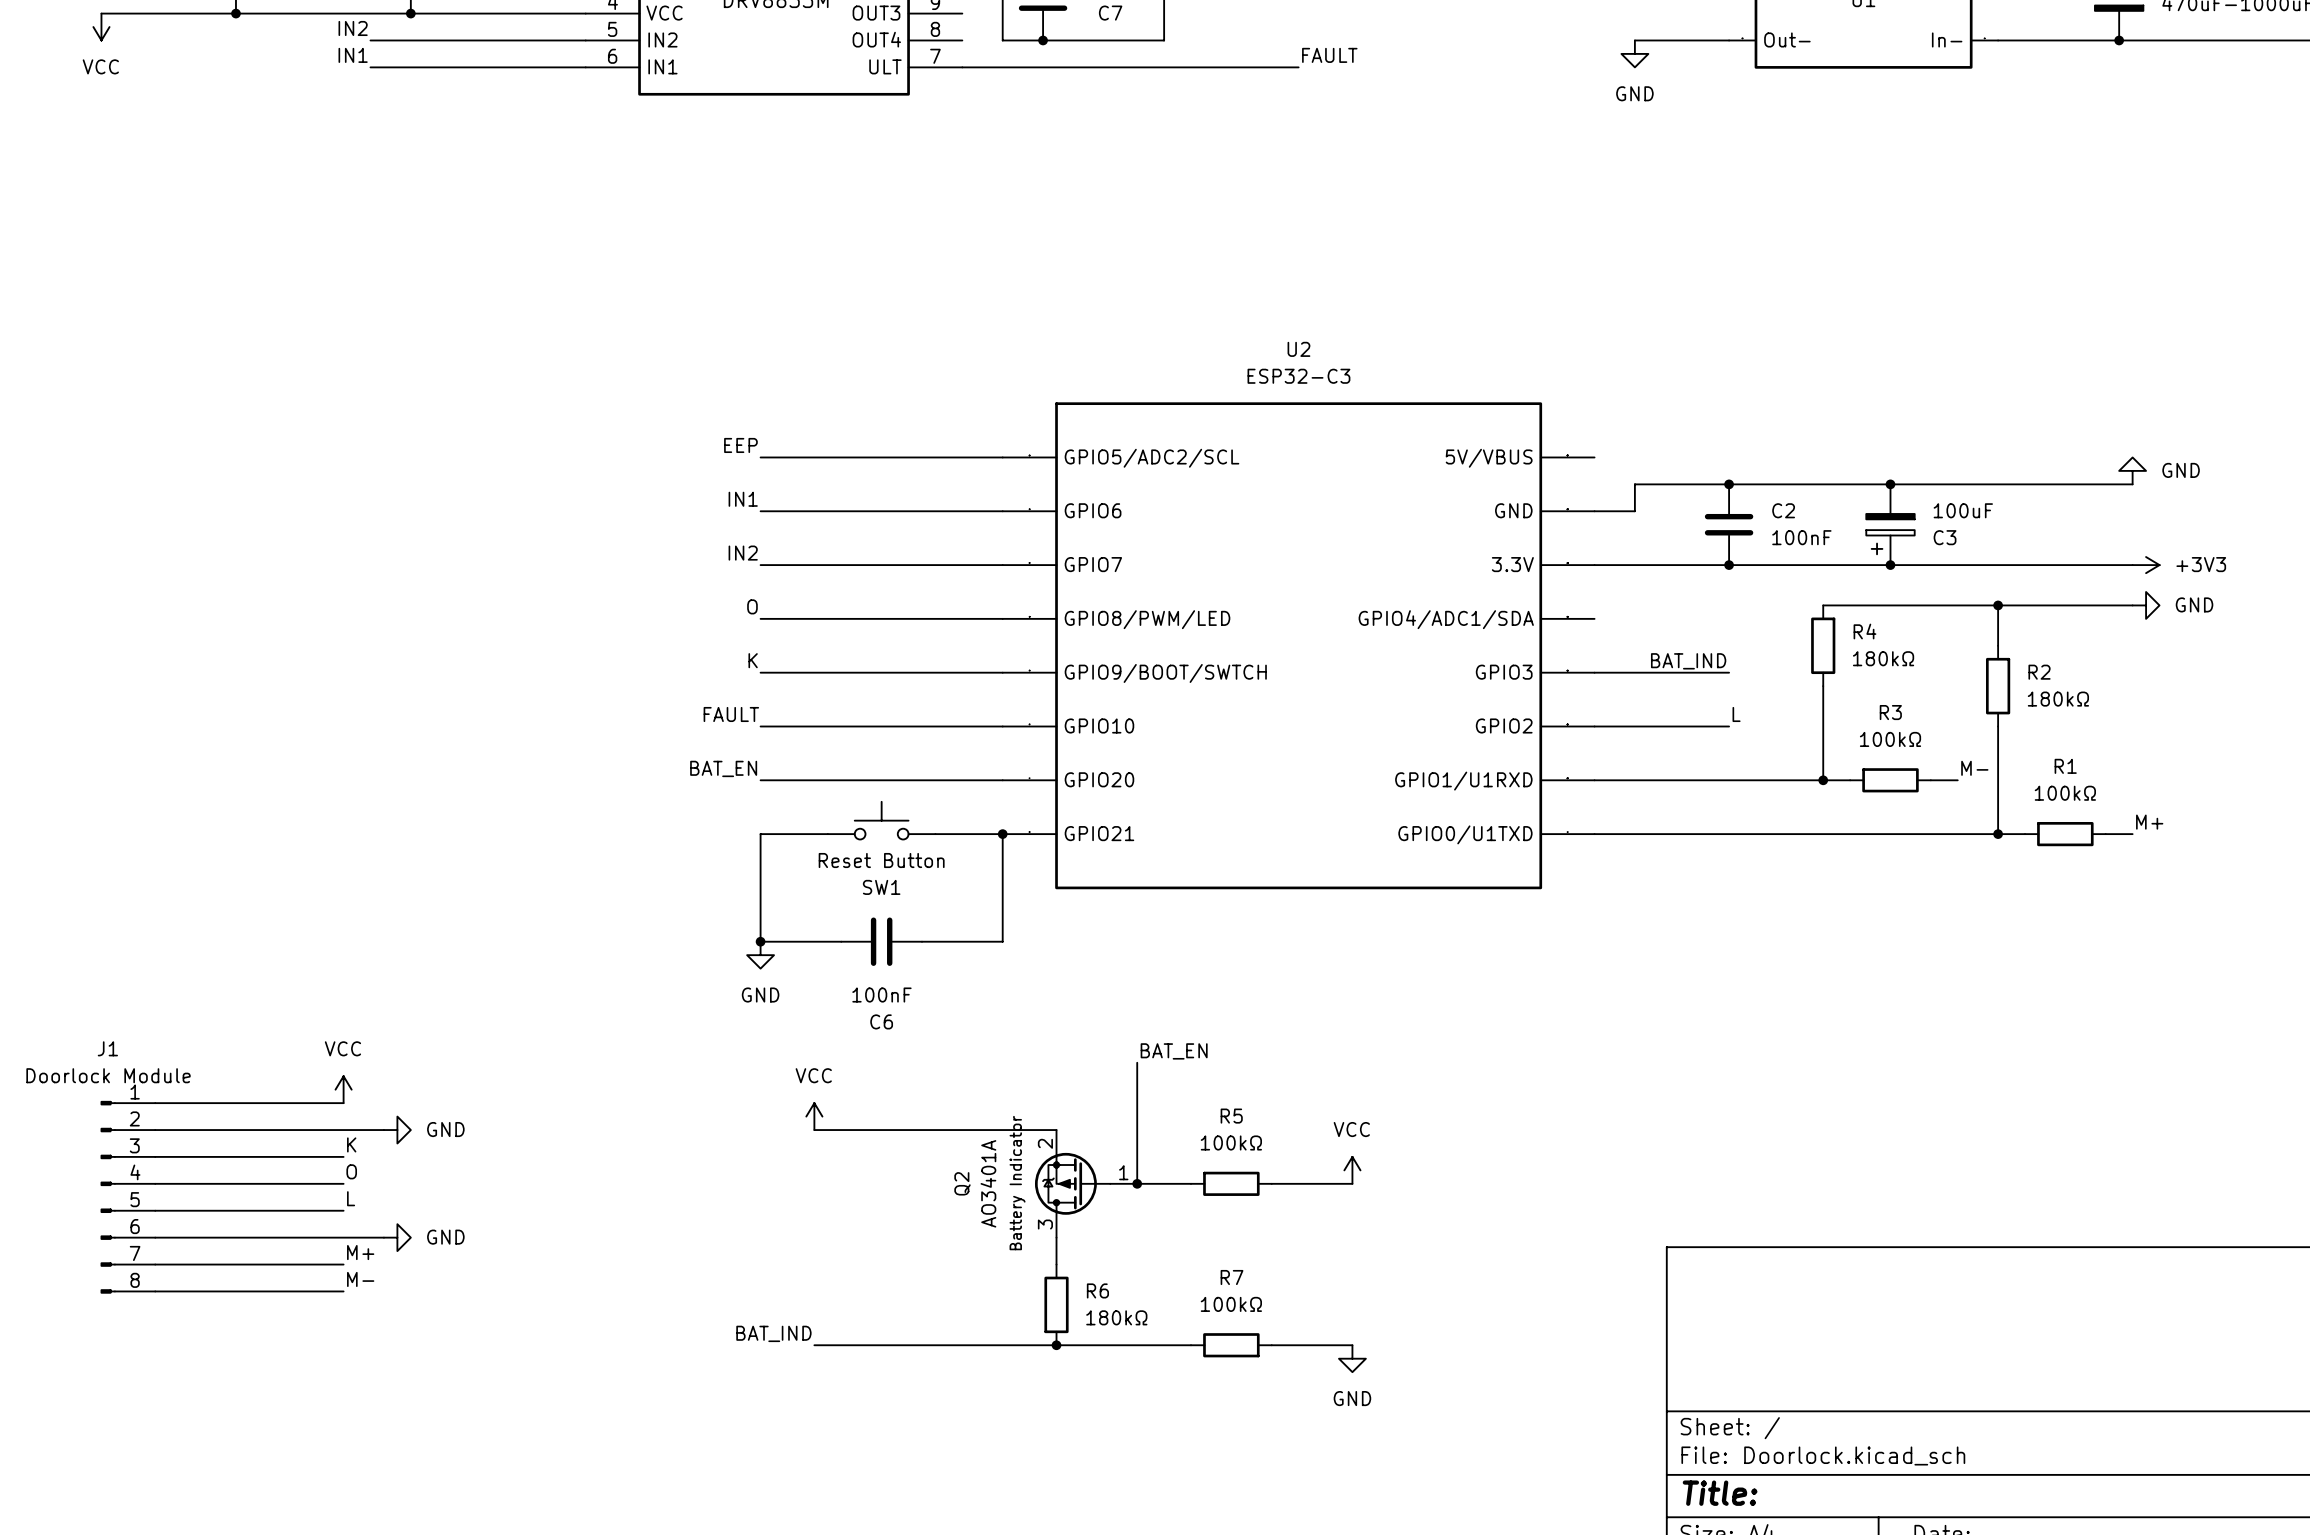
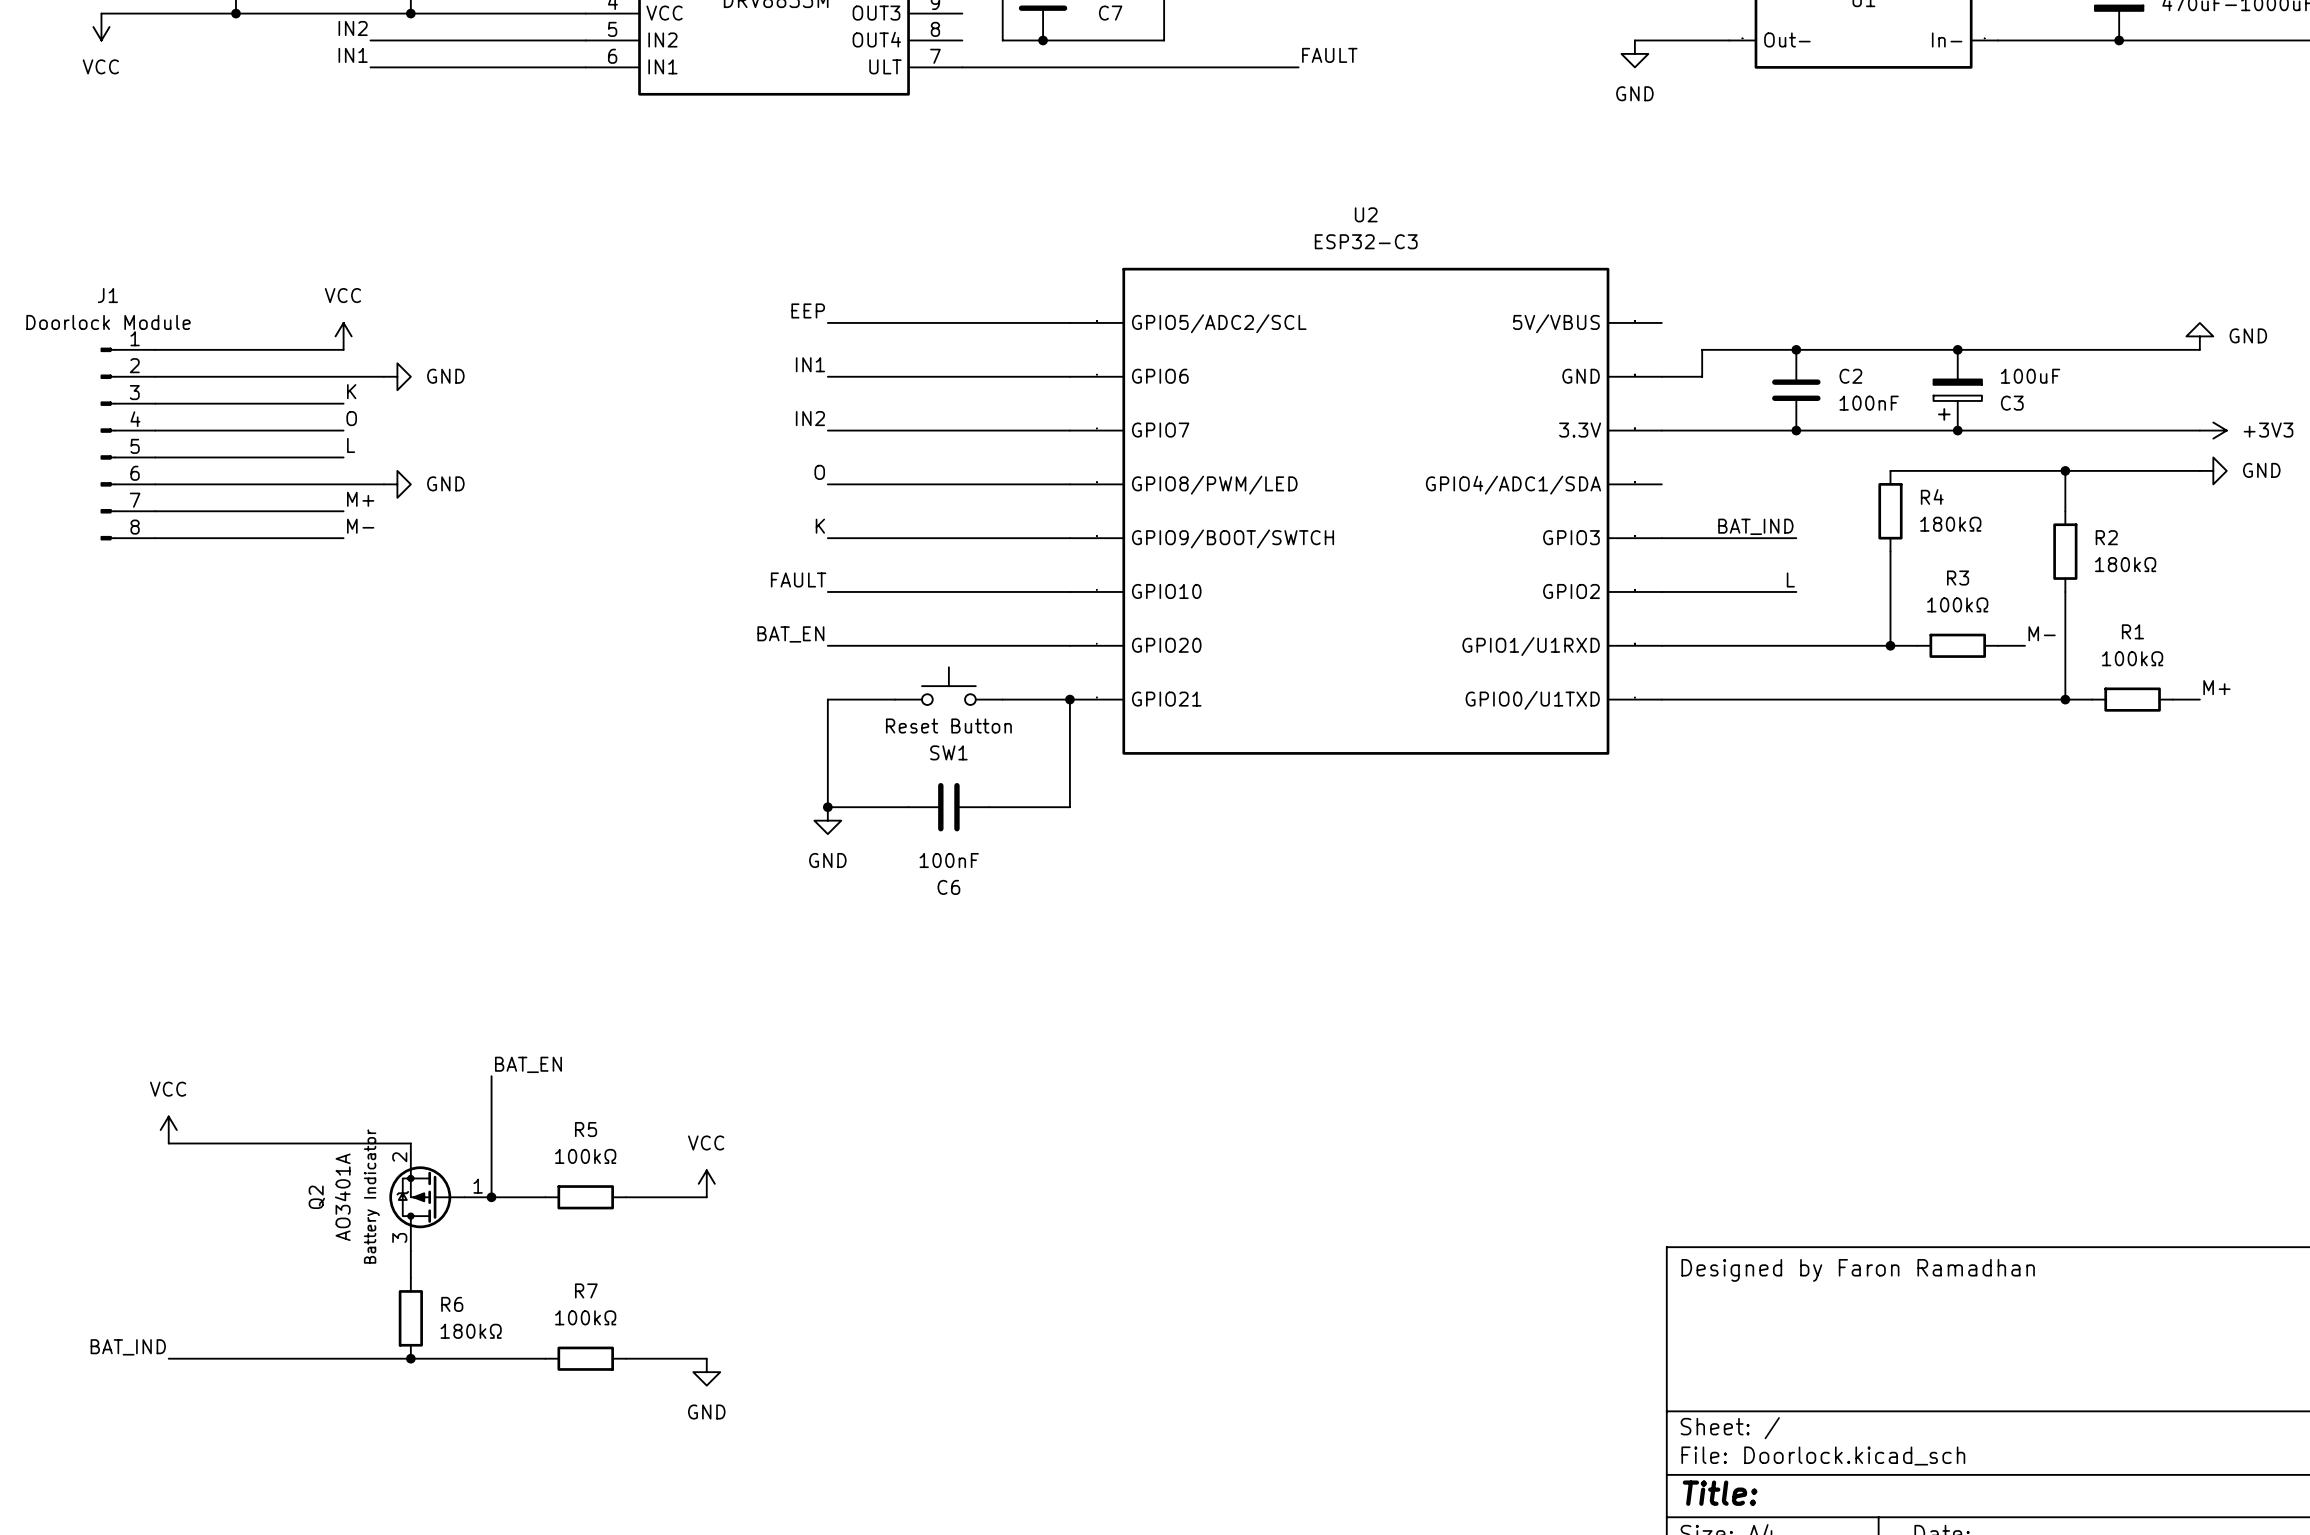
power symbol: none -> VCC (343, 336)
power symbol: none -> GND (2199, 336)
wire: none -> (155, 349) (343, 349)
junction: none -> (1796, 349)
junction: none -> (1957, 349)
wire: none -> (155, 376) (383, 376)
power symbol: none -> GND (397, 376)
label: none -> K (351, 391)
wire: none -> (155, 403) (343, 403)
label: none -> O (351, 418)
wire: none -> (155, 430) (343, 430)
junction: none -> (1796, 430)
junction: none -> (1957, 430)
label: none -> L (351, 445)
label position: EEP (740, 445) -> EEP (808, 310)
wire: none -> (155, 457) (343, 457)
wire: (760, 457) (1002, 457) -> (827, 322) (1069, 322)
wire: none -> (2065, 470) (2065, 511)
junction: none -> (2065, 470)
power symbol: GND (2132, 470) -> none
power symbol: none -> GND (2213, 470)
wire: none -> (155, 484) (383, 484)
power symbol: none -> GND (397, 484)
junction: (1729, 484) -> none
junction: (1890, 484) -> none
wire: (2132, 484) (1634, 484) (1634, 511) (1594, 511) -> (2199, 349) (1702, 349) (1702, 376) (1661, 376)
label: none -> M+ (360, 499)
label position: IN1 (743, 499) -> IN1 (810, 364)
wire: none -> (155, 511) (343, 511)
wire: (760, 511) (1002, 511) -> (827, 376) (1069, 376)
C2 position: (1729, 524) -> (1796, 390)
C3 position: (1890, 524) -> (1957, 390)
label: none -> M- (360, 526)
wire: none -> (155, 538) (343, 538)
label position: IN2 (743, 553) -> IN2 (810, 418)
wire: (760, 565) (1002, 565) -> (827, 430) (1069, 430)
wire: (1594, 565) (2132, 565) -> (1661, 430) (2199, 430)
junction: (1729, 565) -> none
junction: (1890, 565) -> none
power symbol position: +3V3 (2146, 565) -> +3V3 (2213, 430)
wire: (1823, 605) (2132, 605) -> (1890, 470) (2199, 470)
wire: (1998, 605) (1998, 645) -> (2025, 645) (1998, 645)
junction: (1998, 605) -> none
power symbol: GND (2146, 605) -> none
label position: O (752, 606) -> O (819, 472)
wire: (760, 618) (1002, 618) -> (827, 484) (1069, 484)
U2 position: (1298, 645) -> (1365, 511)
R4 position: (1823, 645) -> (1890, 511)
junction: none -> (1890, 645)
label position: K (753, 660) -> K (820, 526)
label position: BAT_IND (1688, 661) -> BAT_IND (1755, 526)
wire: (760, 672) (1002, 672) -> (827, 538) (1069, 538)
wire: (1594, 672) (1729, 672) -> (1661, 538) (1796, 538)
wire: (1823, 686) (1823, 780) -> (1890, 551) (1890, 645)
R2 position: (1998, 686) -> (2065, 551)
junction: none -> (1069, 699)
junction: none -> (2065, 699)
label position: FAULT (731, 714) -> FAULT (798, 579)
label position: L (1736, 714) -> L (1790, 579)
wire: (760, 726) (1002, 726) -> (827, 591) (1069, 591)
wire: (1594, 726) (1729, 726) -> (1661, 591) (1796, 591)
wire: (1998, 726) (1998, 834) -> (2065, 591) (2065, 699)
label position: BAT_EN (723, 768) -> BAT_EN (790, 634)
label position: M- (1974, 768) -> M- (2042, 633)
wire: (760, 780) (1002, 780) -> (827, 645) (1069, 645)
wire: (1594, 780) (1850, 780) -> (1661, 645) (1917, 645)
junction: (1823, 780) -> none
R3 position: (1890, 780) -> (1957, 645)
wire: (1930, 780) (1957, 780) -> none
junction: none -> (827, 807)
SW1 position: (881, 820) -> (948, 686)
label position: M+ (2149, 822) -> M+ (2216, 687)
wire: (827, 834) (760, 834) (760, 941) (841, 941) -> (895, 699) (827, 699) (827, 807) (908, 807)
wire: (935, 834) (1002, 834) (1002, 941) (922, 941) -> (1002, 699) (1069, 699) (1069, 807) (989, 807)
junction: (1002, 834) -> none
wire: (1594, 834) (2025, 834) -> (1661, 699) (2092, 699)
junction: (1998, 834) -> none
R1 position: (2065, 834) -> (2132, 699)
wire: (2105, 834) (2132, 834) -> (2172, 699) (2199, 699)
junction: (760, 941) -> none
C6 position: (881, 941) -> (948, 807)
power symbol position: GND (760, 955) -> GND (827, 820)
label: BAT_EN (1174, 1051) -> none
wire: (1137, 1062) (1137, 1183) (1191, 1183) -> none
label: none -> BAT_EN (528, 1064)
wire: none -> (491, 1076) (491, 1197) (545, 1197)
power symbol position: VCC (343, 1089) -> VCC (168, 1130)
wire: (155, 1103) (343, 1103) -> none
power symbol position: VCC (814, 1116) -> VCC (706, 1183)
wire: (155, 1130) (383, 1130) -> none
power symbol: GND (397, 1130) -> none
wire: (814, 1130) (1056, 1130) -> none
wire: none -> (168, 1143) (410, 1143)
label: K (351, 1144) -> none
wire: (155, 1156) (343, 1156) -> none
power symbol: VCC (1352, 1170) -> none
label: O (351, 1171) -> none
wire: (155, 1183) (343, 1183) -> none
Q2 position: (1086, 1183) -> (440, 1197)
junction: (1137, 1183) -> none
R5 position: (1231, 1183) -> (585, 1197)
wire: (1271, 1183) (1352, 1183) -> none
J1 position: (127, 1197) -> (127, 444)
junction: none -> (491, 1197)
wire: none -> (626, 1197) (706, 1197)
label: L (351, 1198) -> none
wire: (155, 1210) (343, 1210) -> none
wire: (155, 1237) (383, 1237) -> none
power symbol: GND (397, 1237) -> none
wire: (1056, 1237) (1056, 1264) -> none
wire: none -> (410, 1251) (410, 1278)
label: M+ (360, 1252) -> none
wire: (155, 1264) (343, 1264) -> none
title block: none -> Designed by Faron Ramadhan (1858, 1270)
label: M- (360, 1279) -> none
wire: (155, 1291) (343, 1291) -> none
R6 position: (1056, 1304) -> (410, 1318)
label: BAT_IND (773, 1333) -> none
wire: (814, 1345) (1191, 1345) -> none
junction: (1056, 1345) -> none
R7 position: (1231, 1345) -> (585, 1358)
wire: (1271, 1345) (1352, 1345) -> none
label: none -> BAT_IND (128, 1347)
wire: none -> (168, 1358) (545, 1358)
junction: none -> (410, 1358)
wire: none -> (626, 1358) (706, 1358)
power symbol: GND (1352, 1358) -> none
power symbol: none -> GND (706, 1372)

